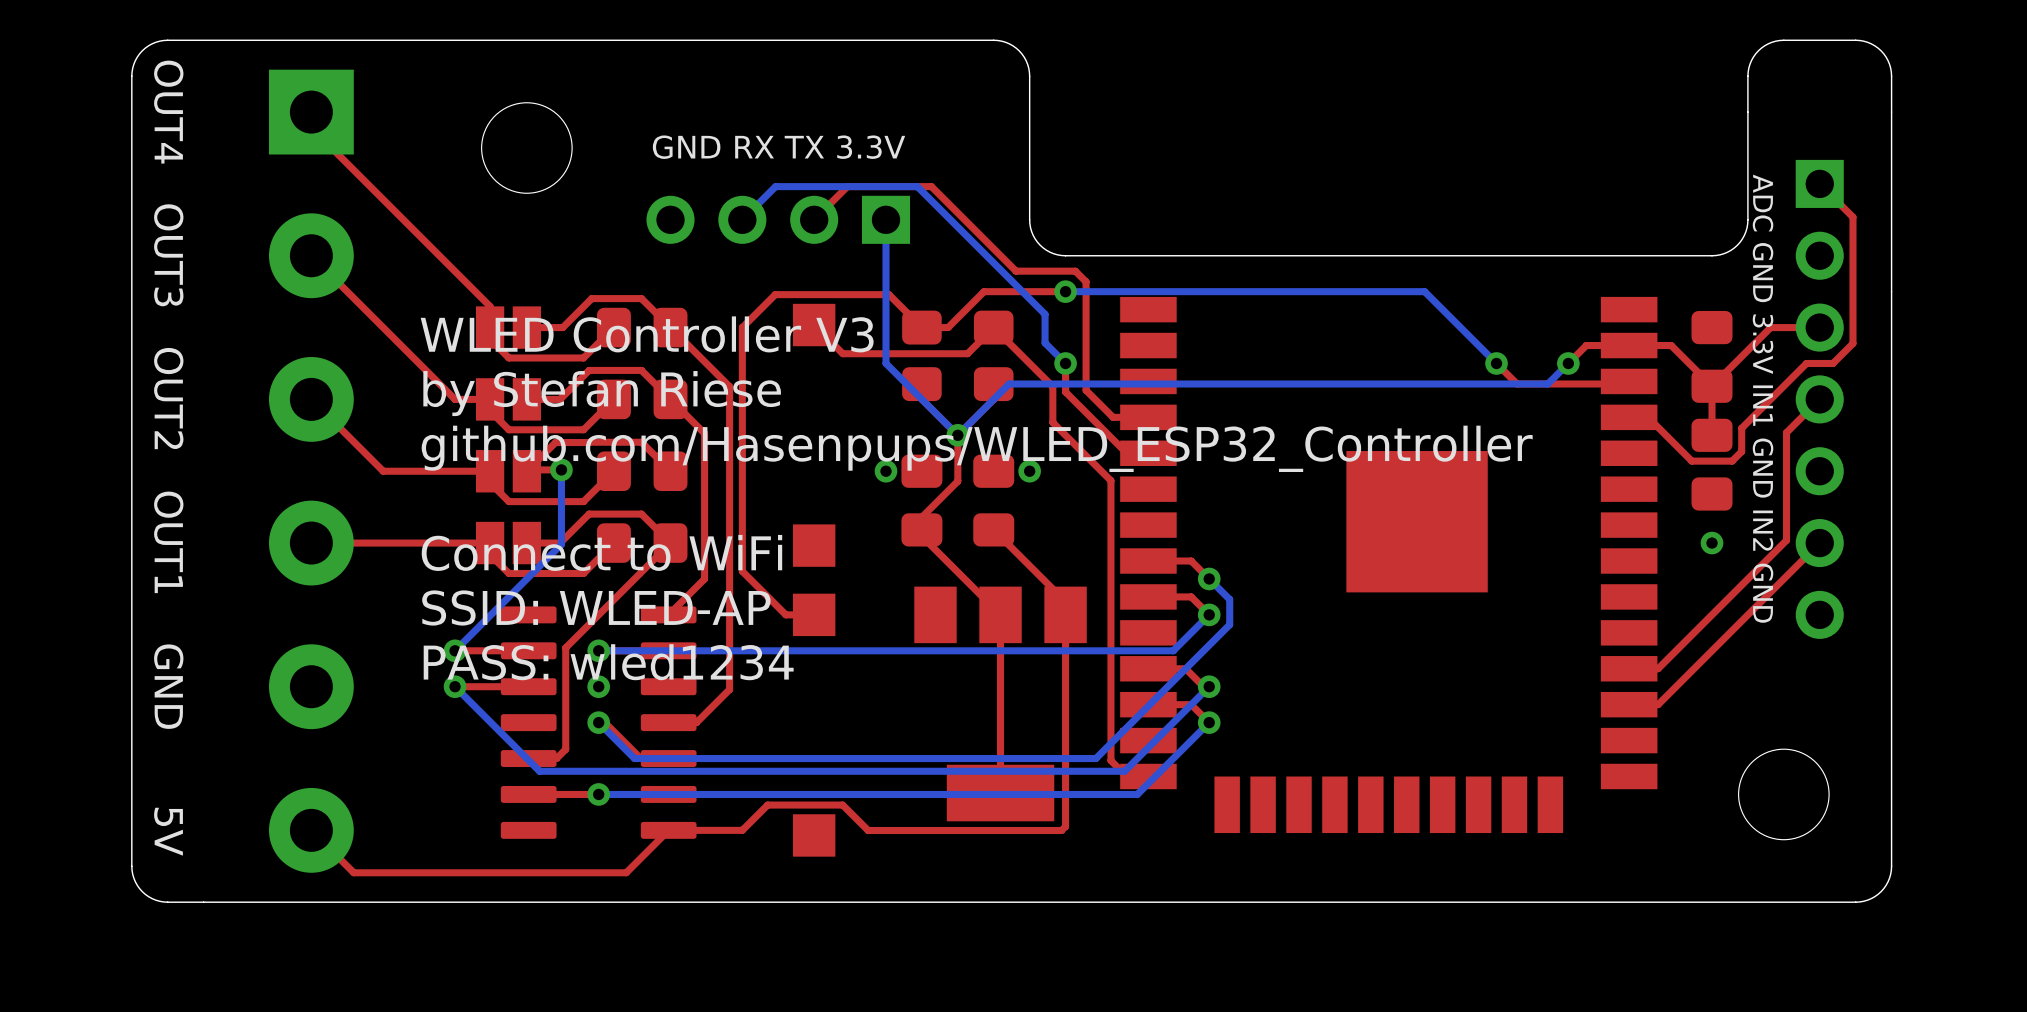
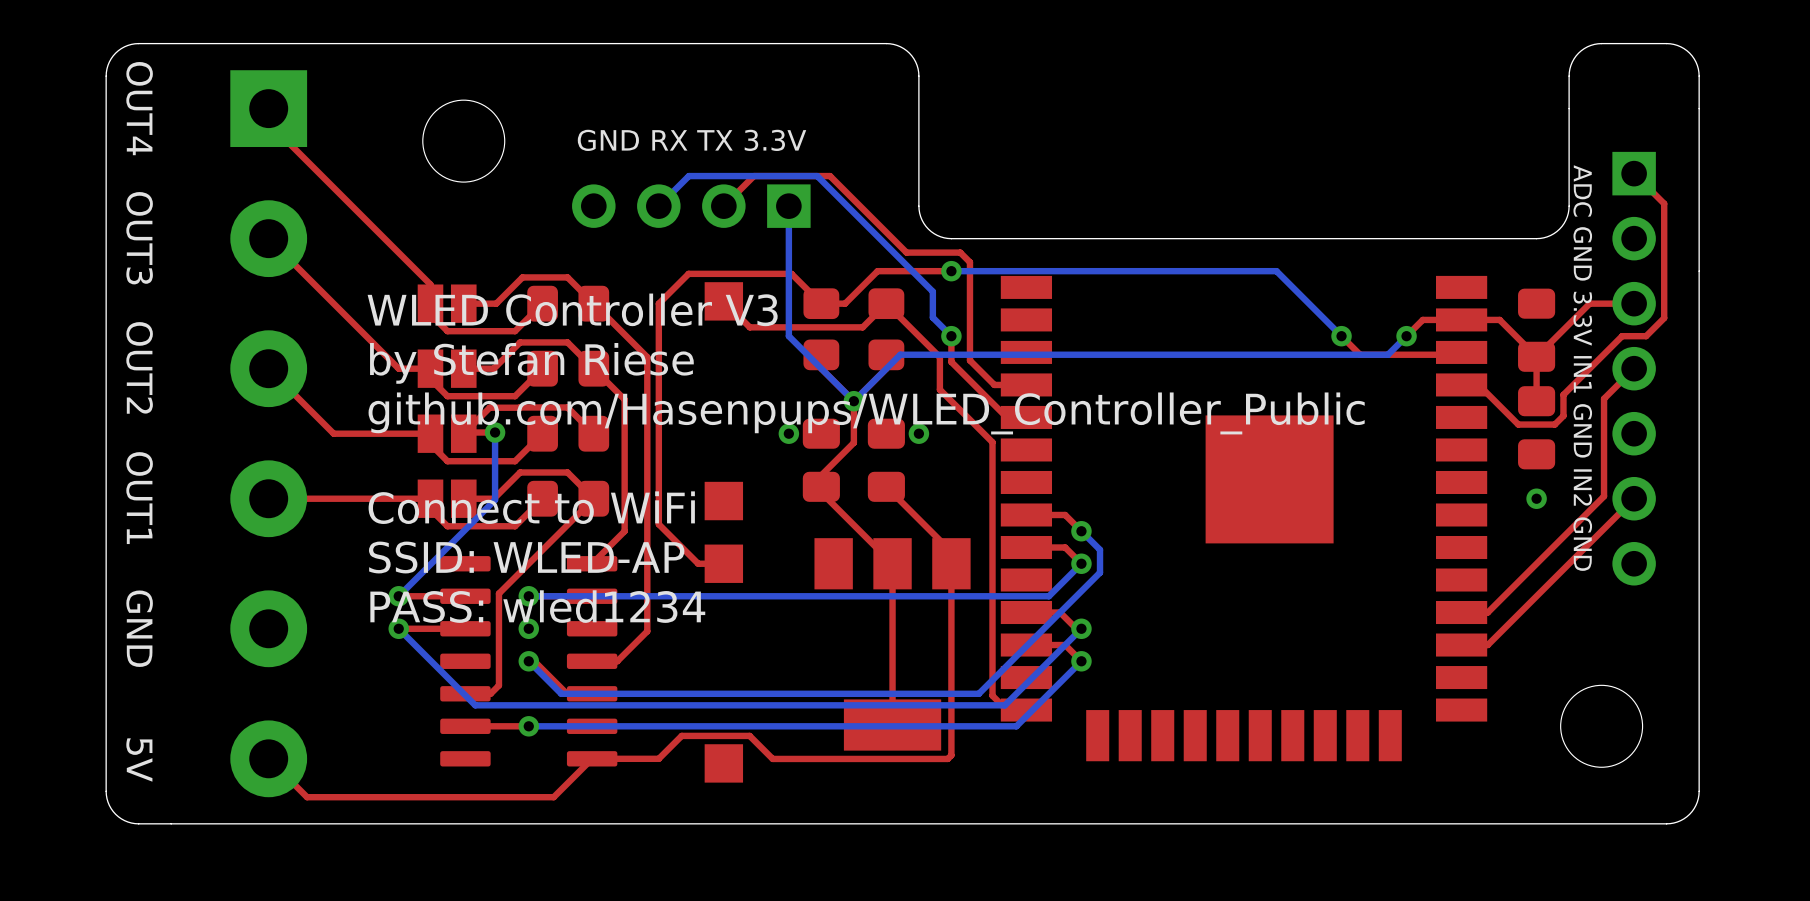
text: github.com/Hasenpups/WLED_ESP32_Controller (977, 448) -> github.com/Hasenpups/WLED_Controller_Public (866, 413)

